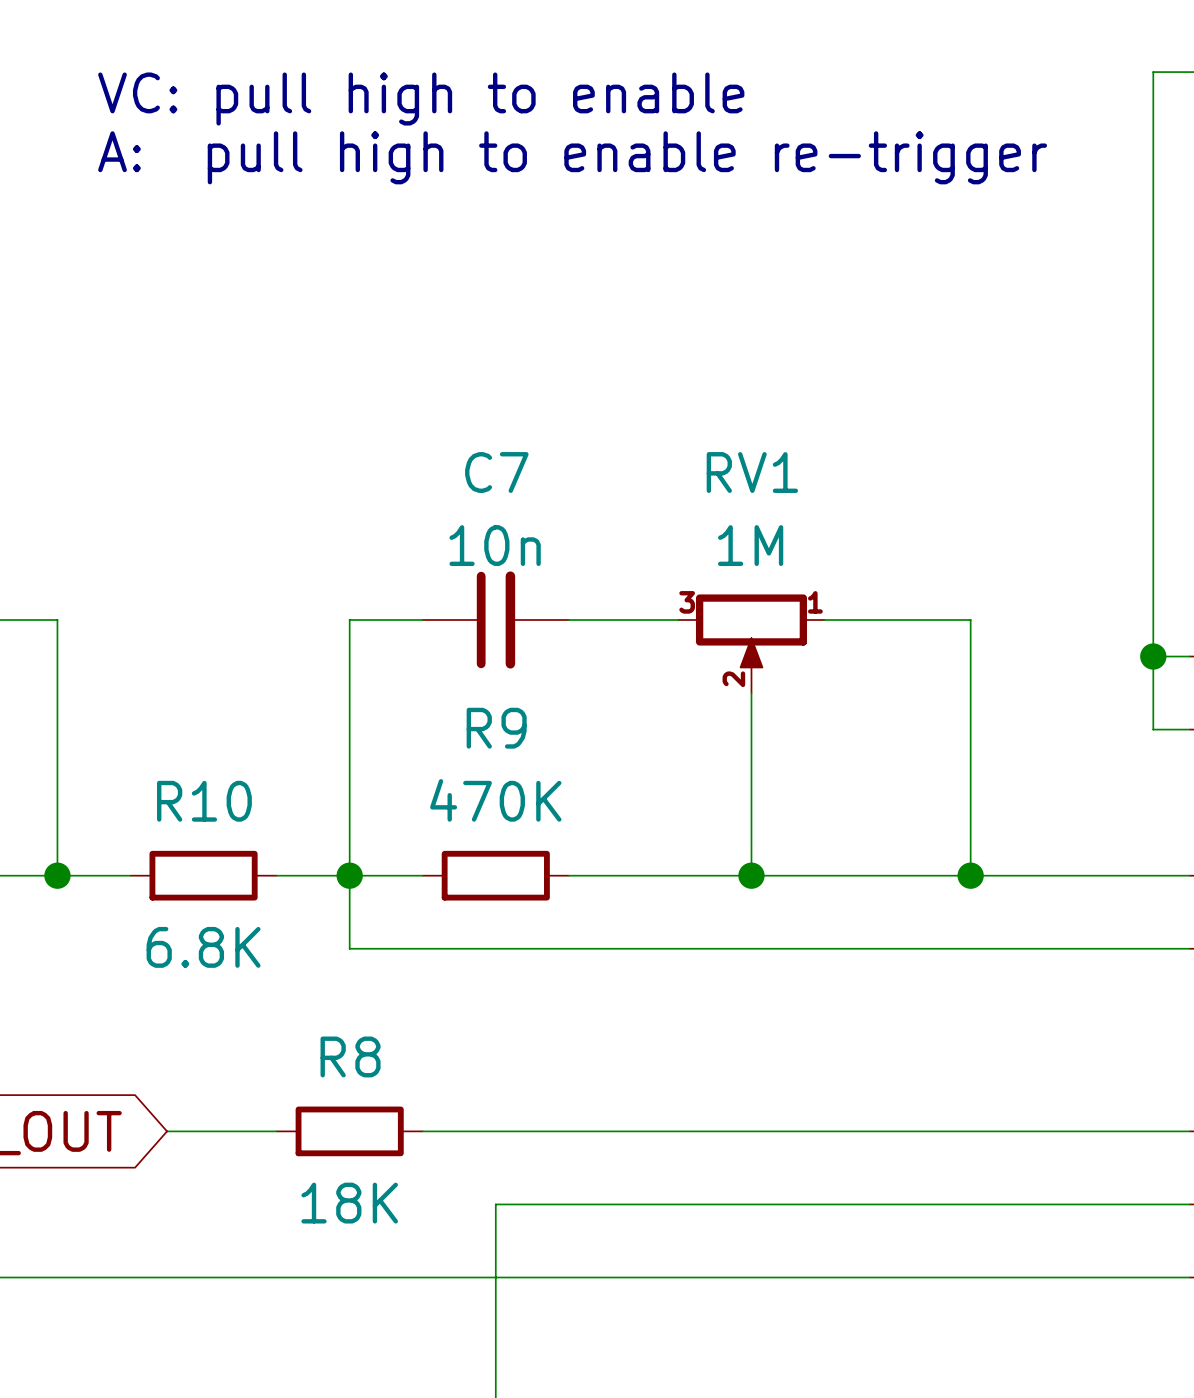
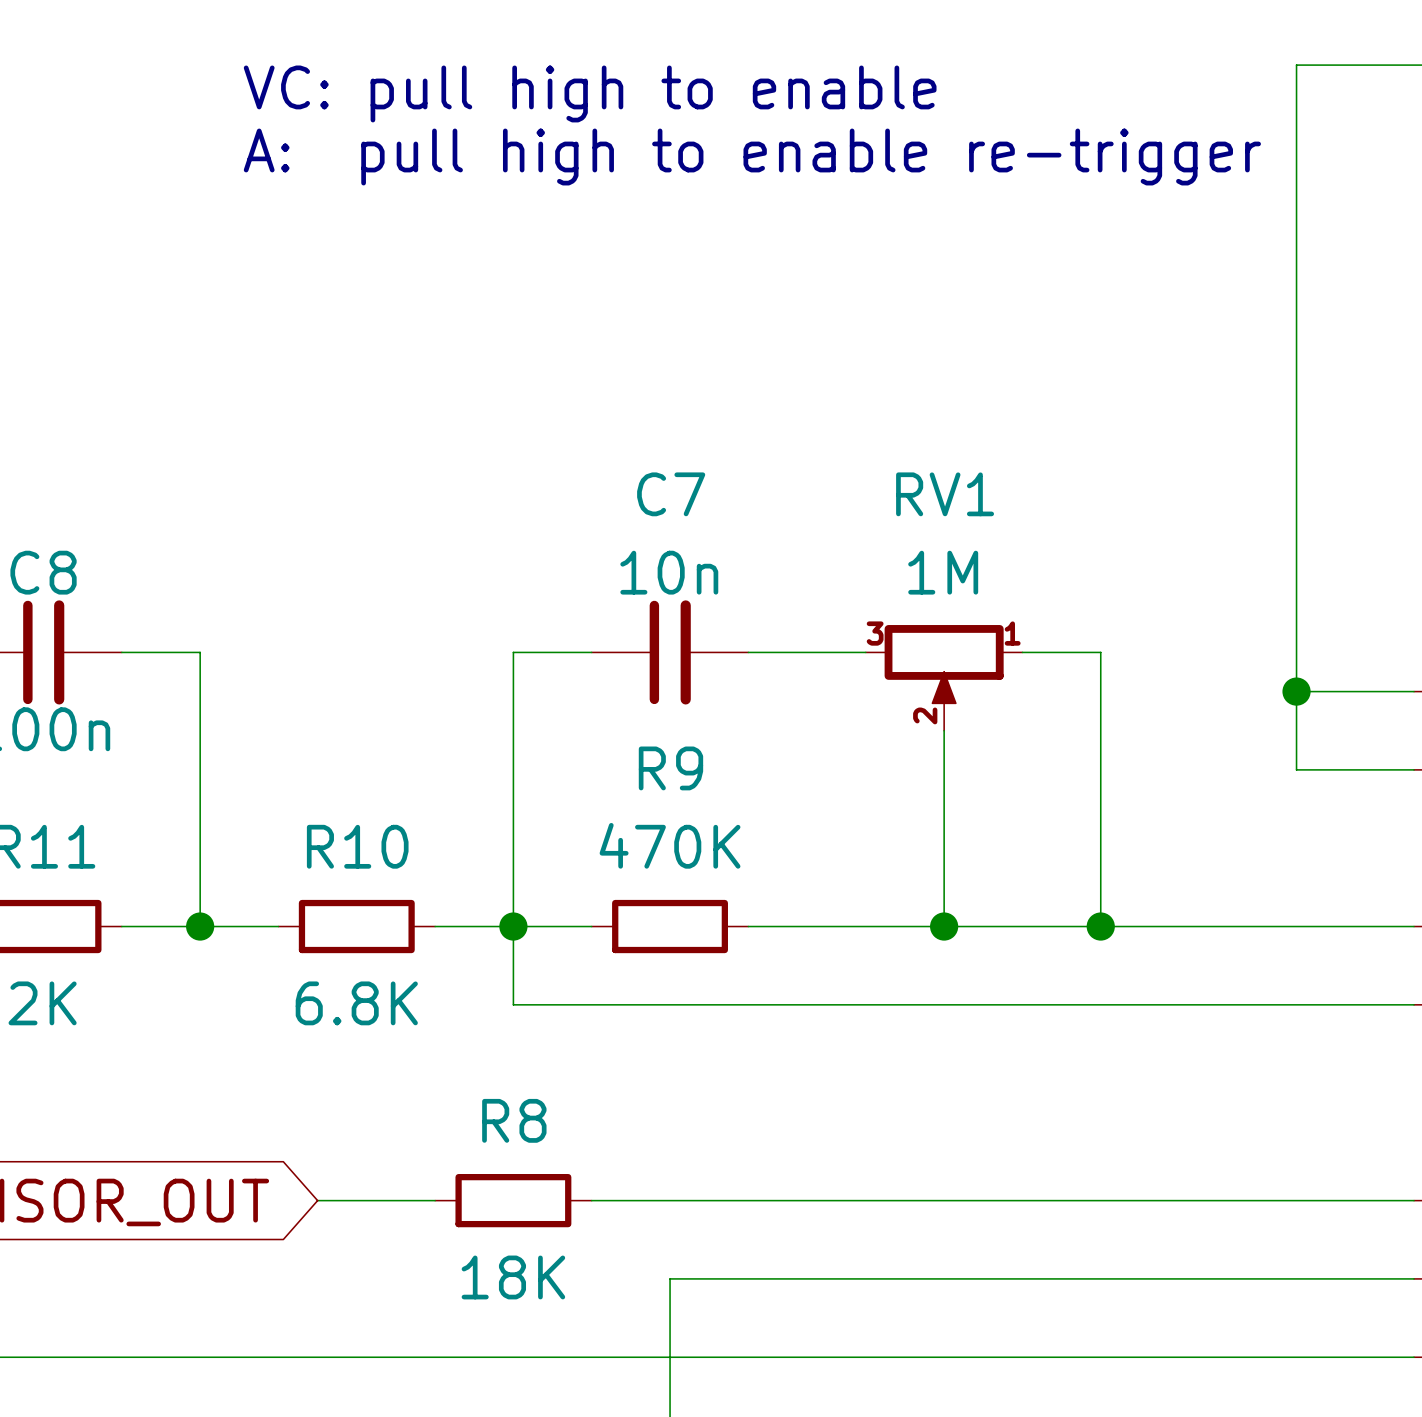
wire: (1153, 72) (1153, 729) -> (1374, 65) (1296, 65) (1296, 769) (1374, 769)
wire: (897, 619) (970, 619) (970, 875) -> (1100, 652) (1100, 926)
wire: none -> (1296, 691) (1374, 691)
junction position: (1153, 656) -> (1296, 691)
junction position: (970, 875) -> (1100, 926)

